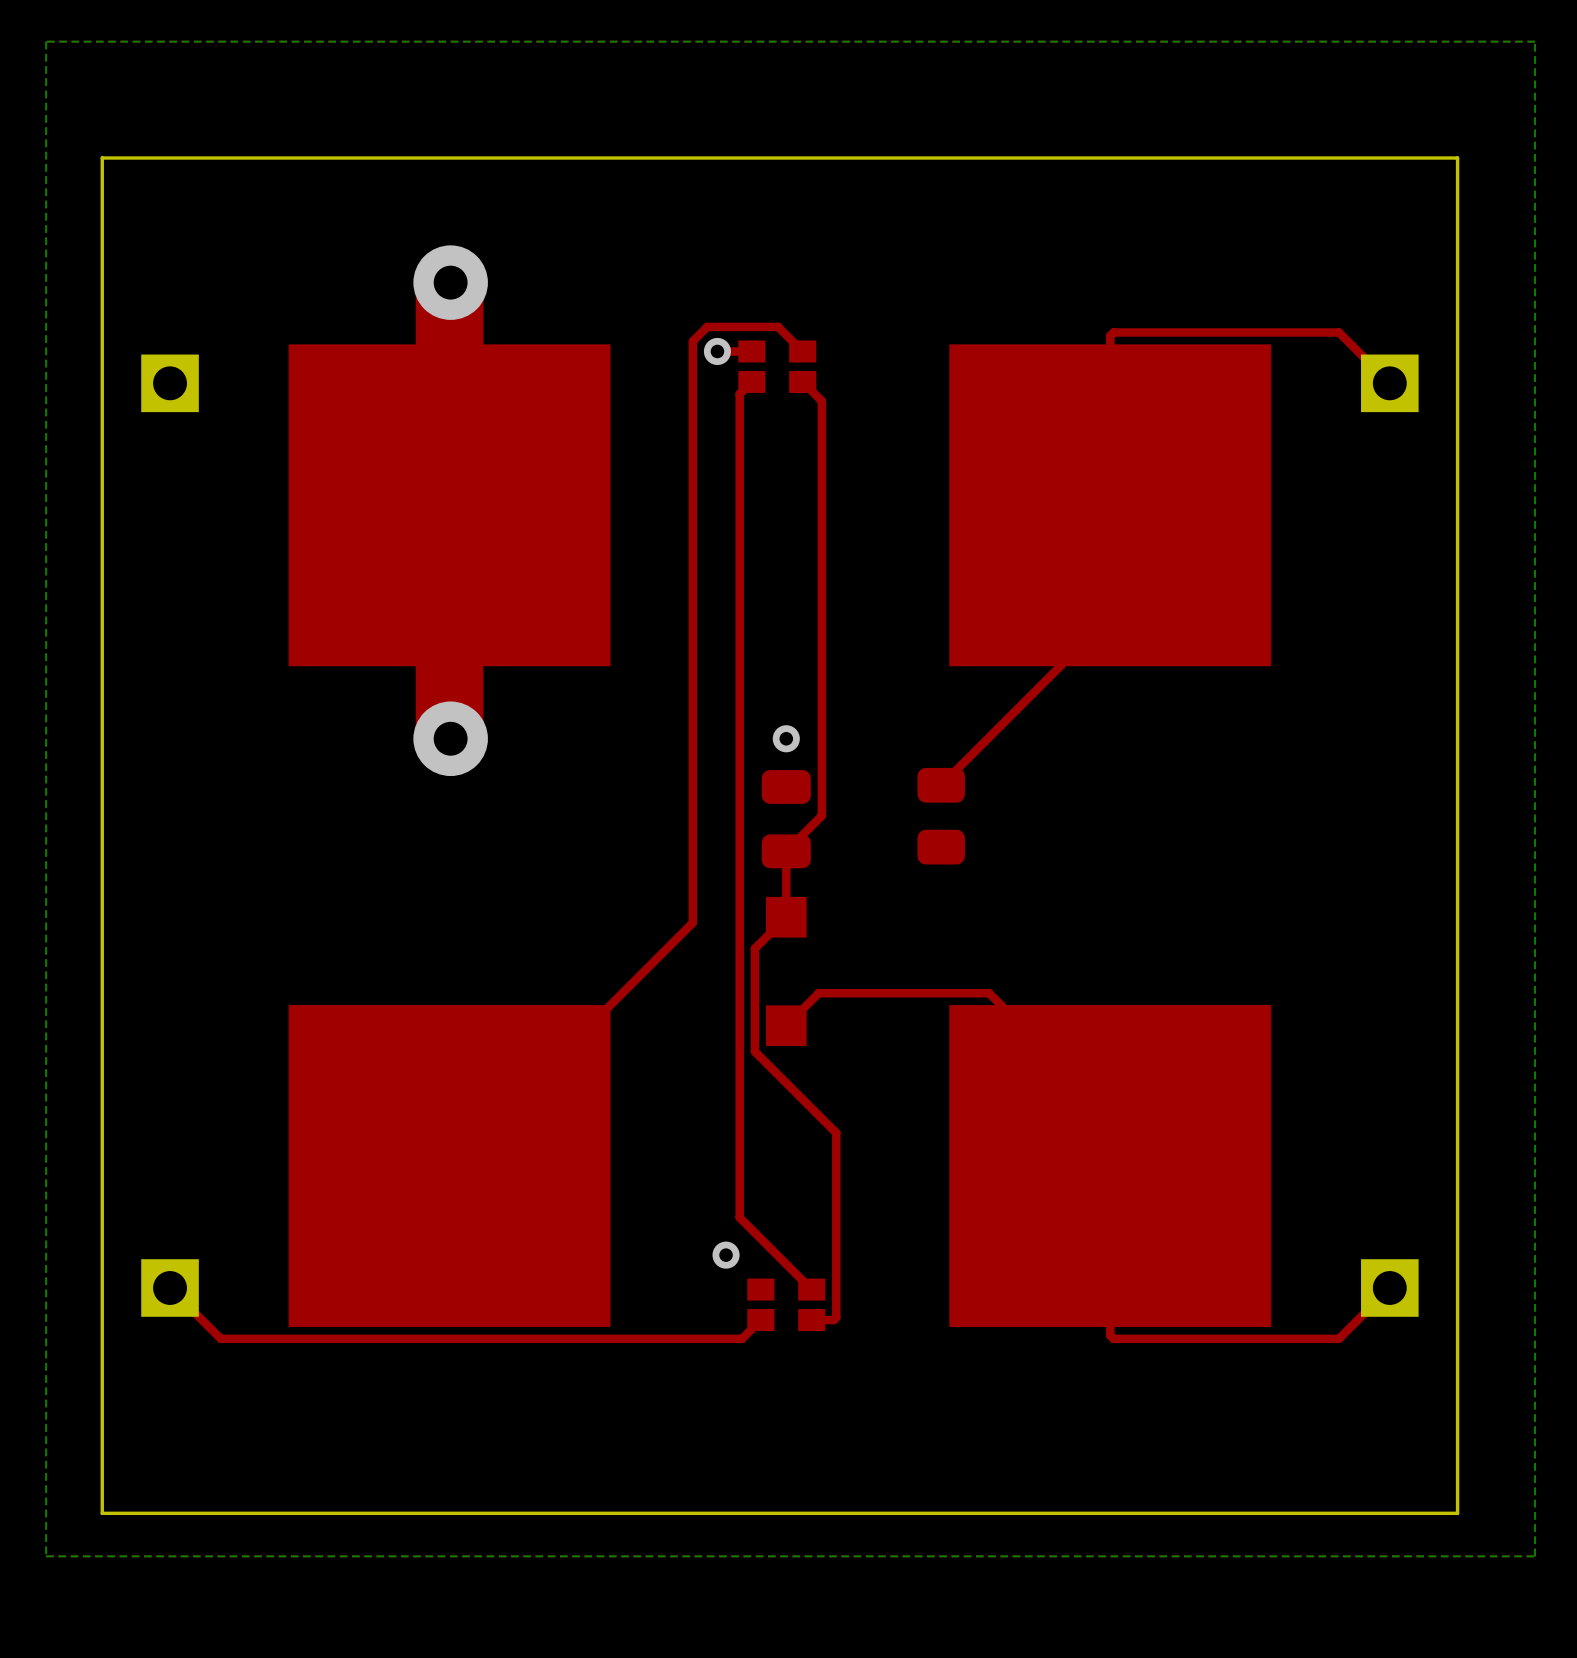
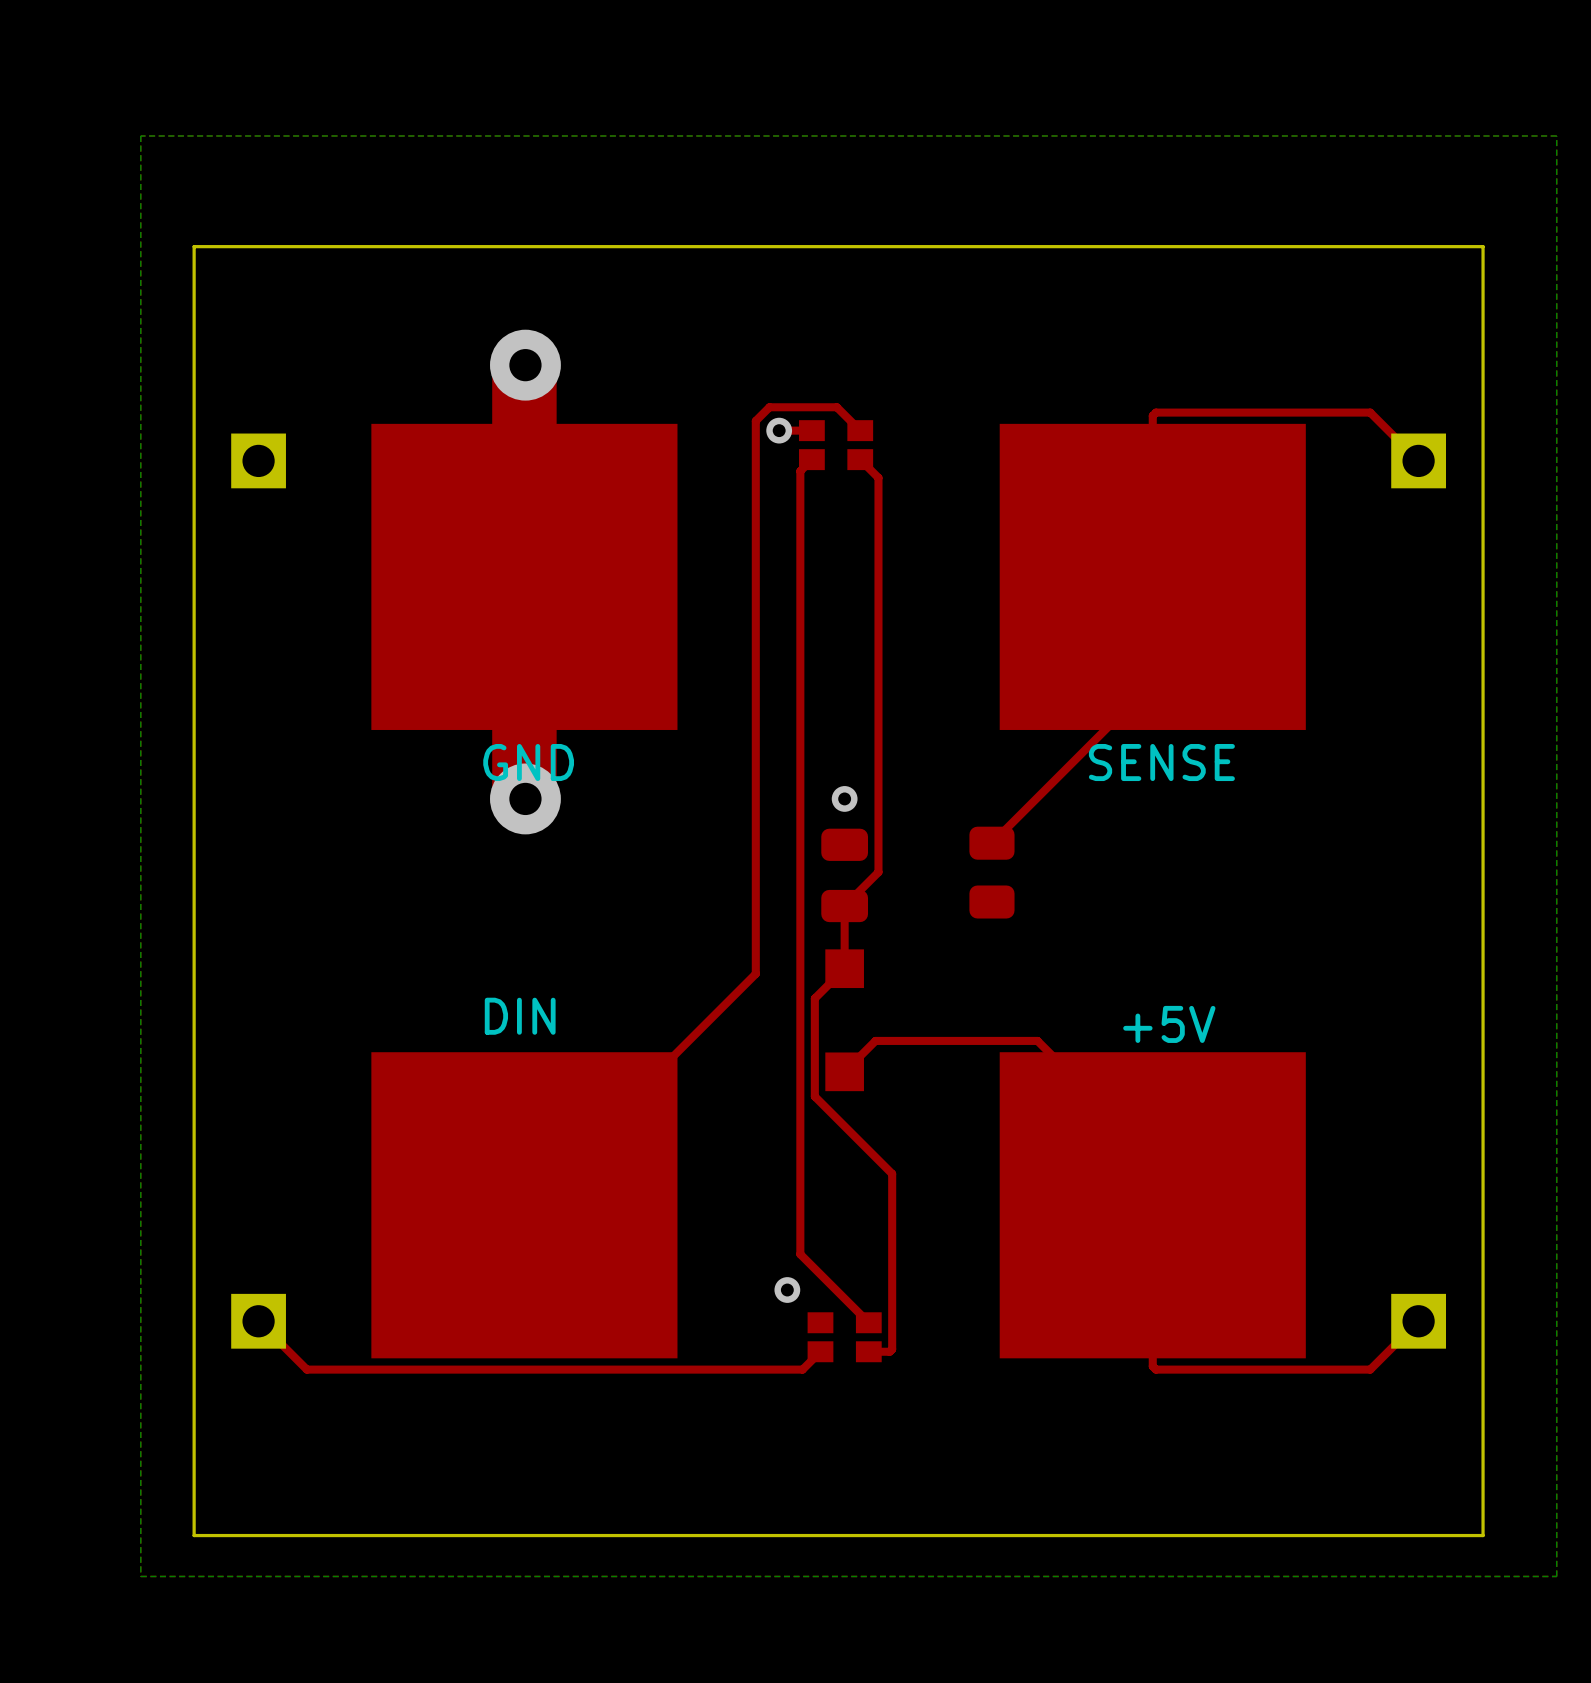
text: none -> GND (528, 762)
text: none -> SENSE (1161, 762)
text: none -> DIN (520, 1016)
text: none -> +5V (1169, 1024)

